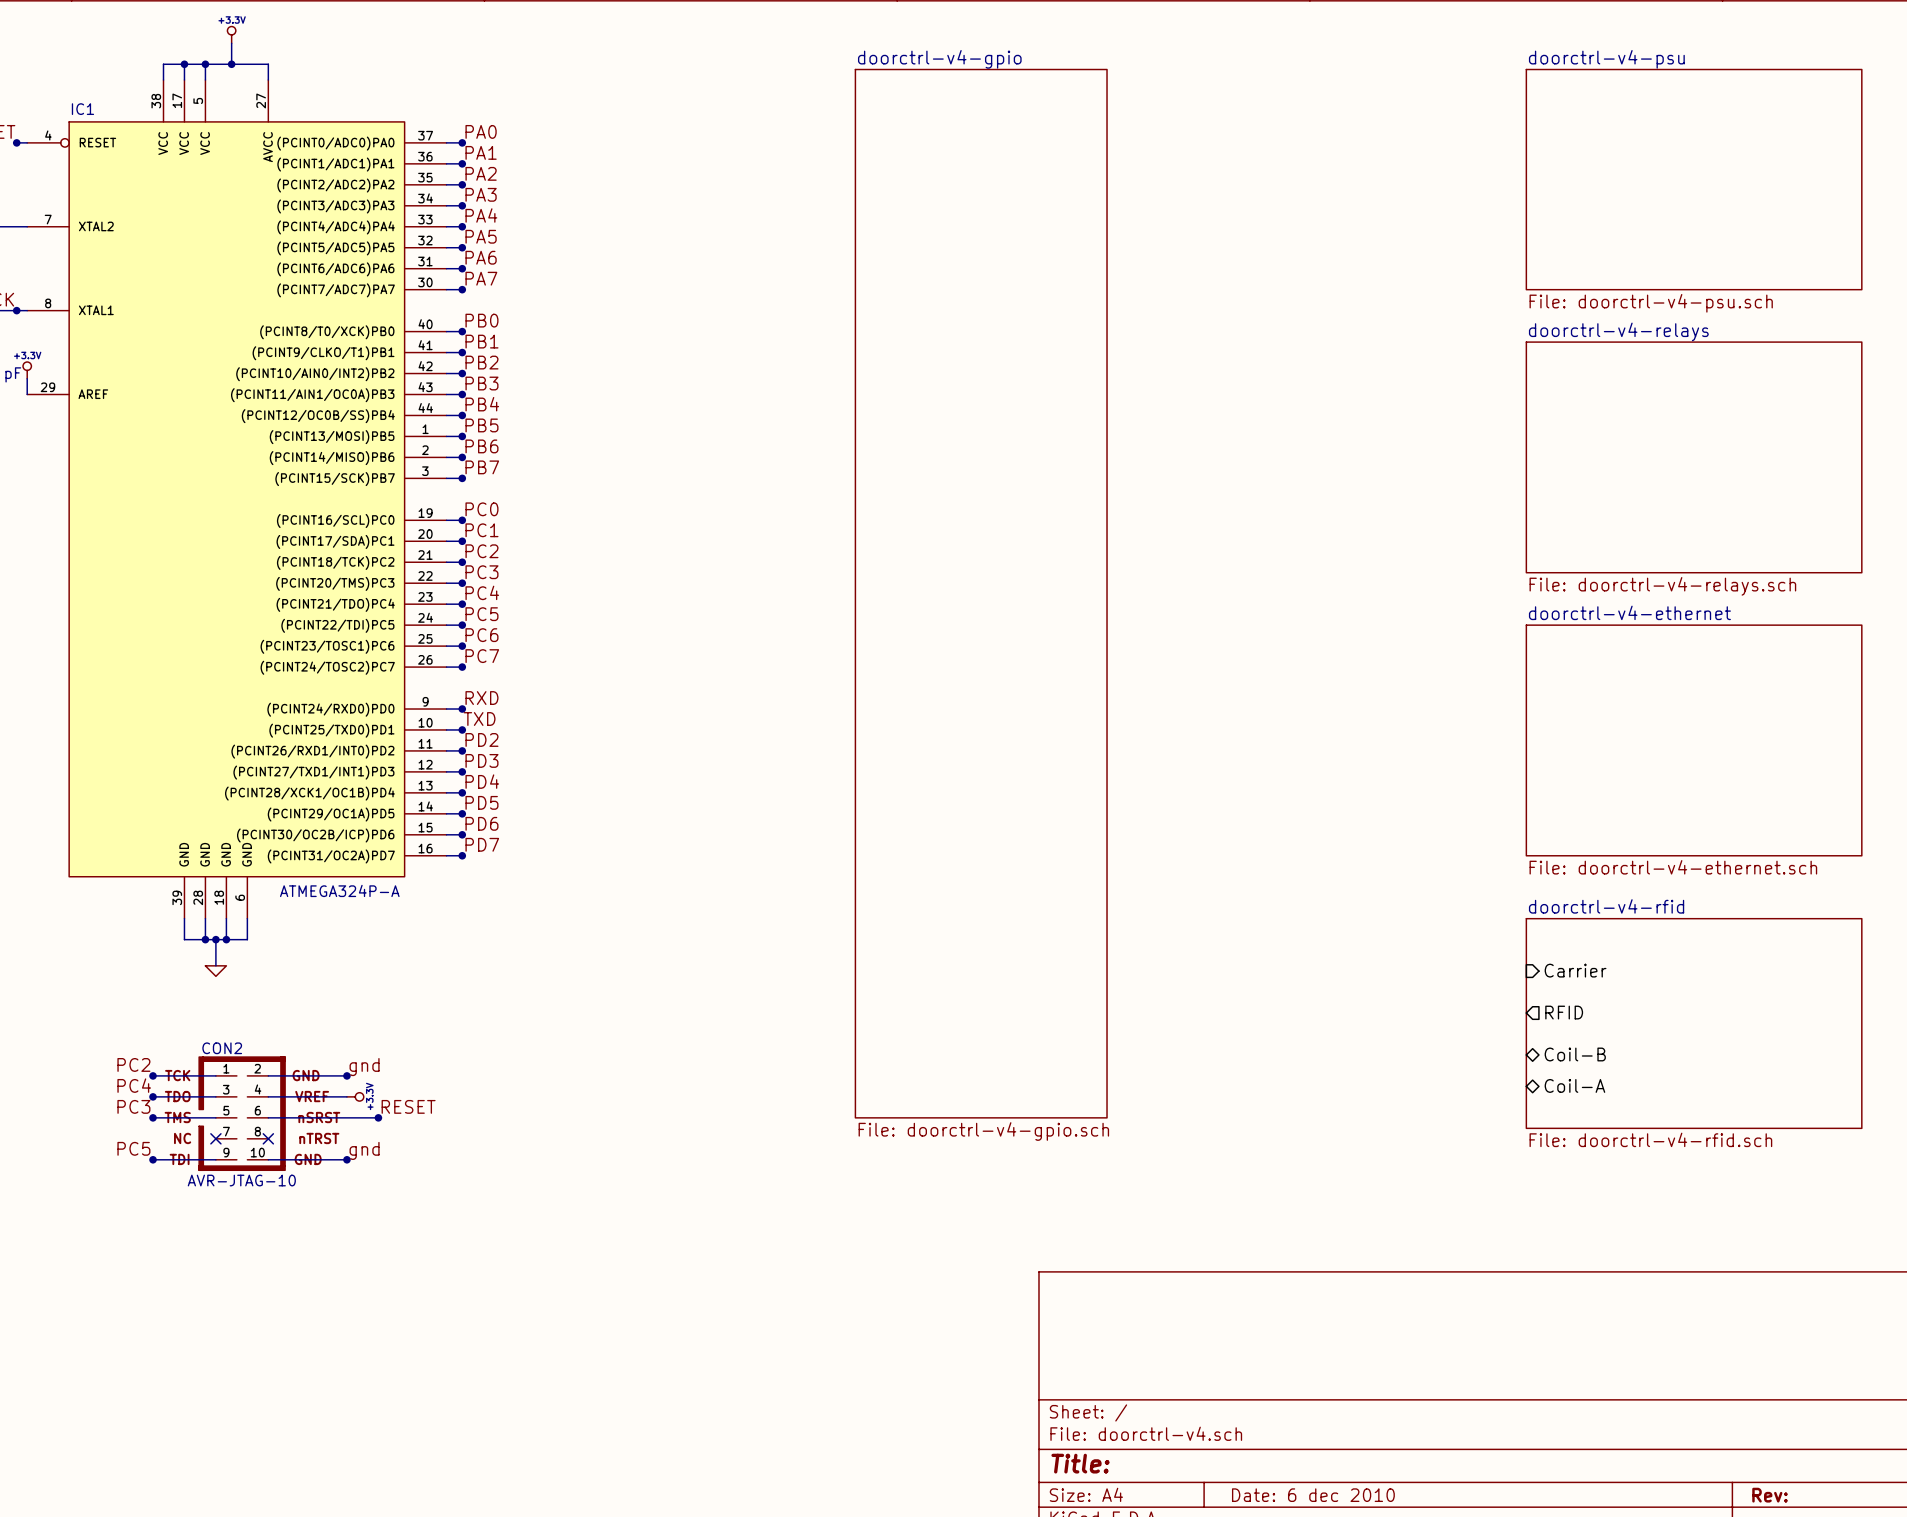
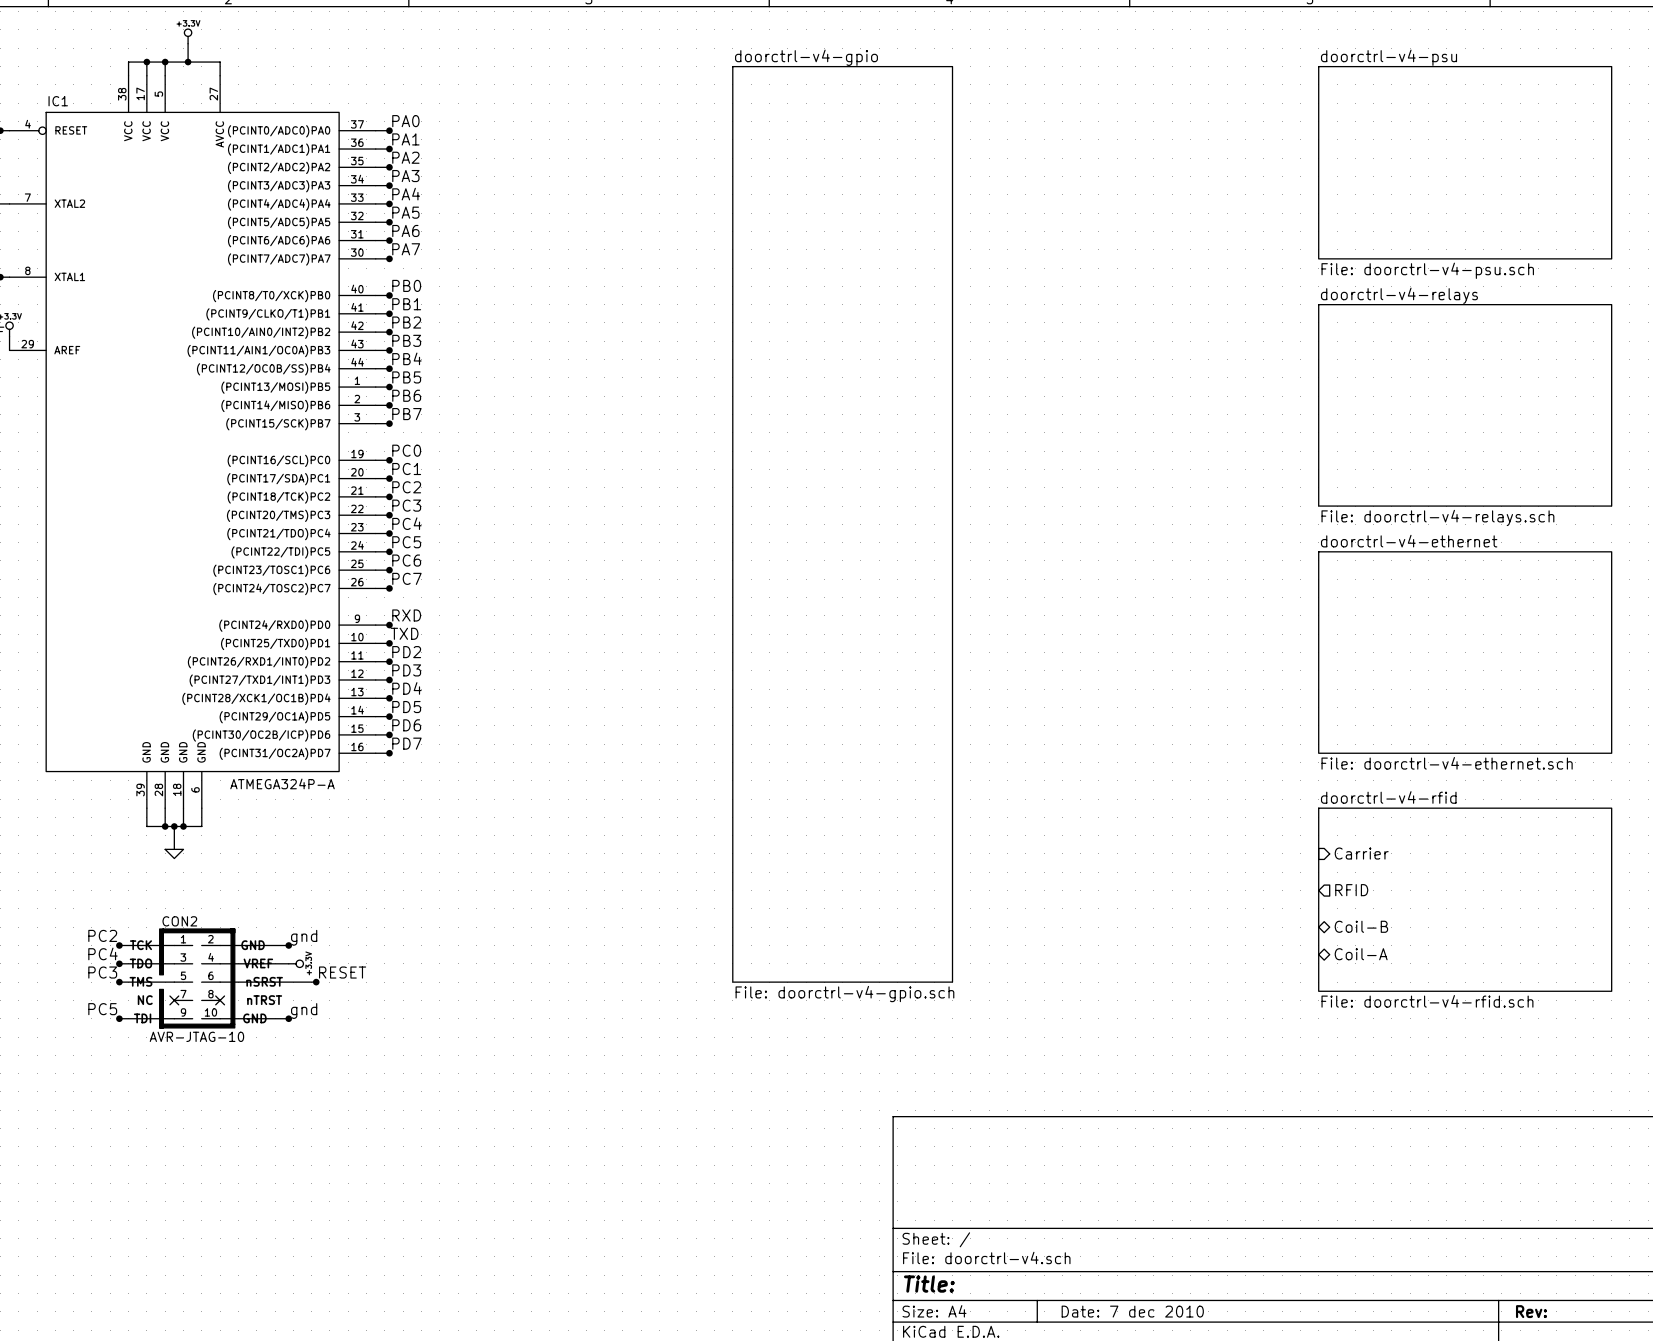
title block: Date: 6 dec 2010 (1313, 1495) -> Date: 7 dec 2010 (1132, 1311)

